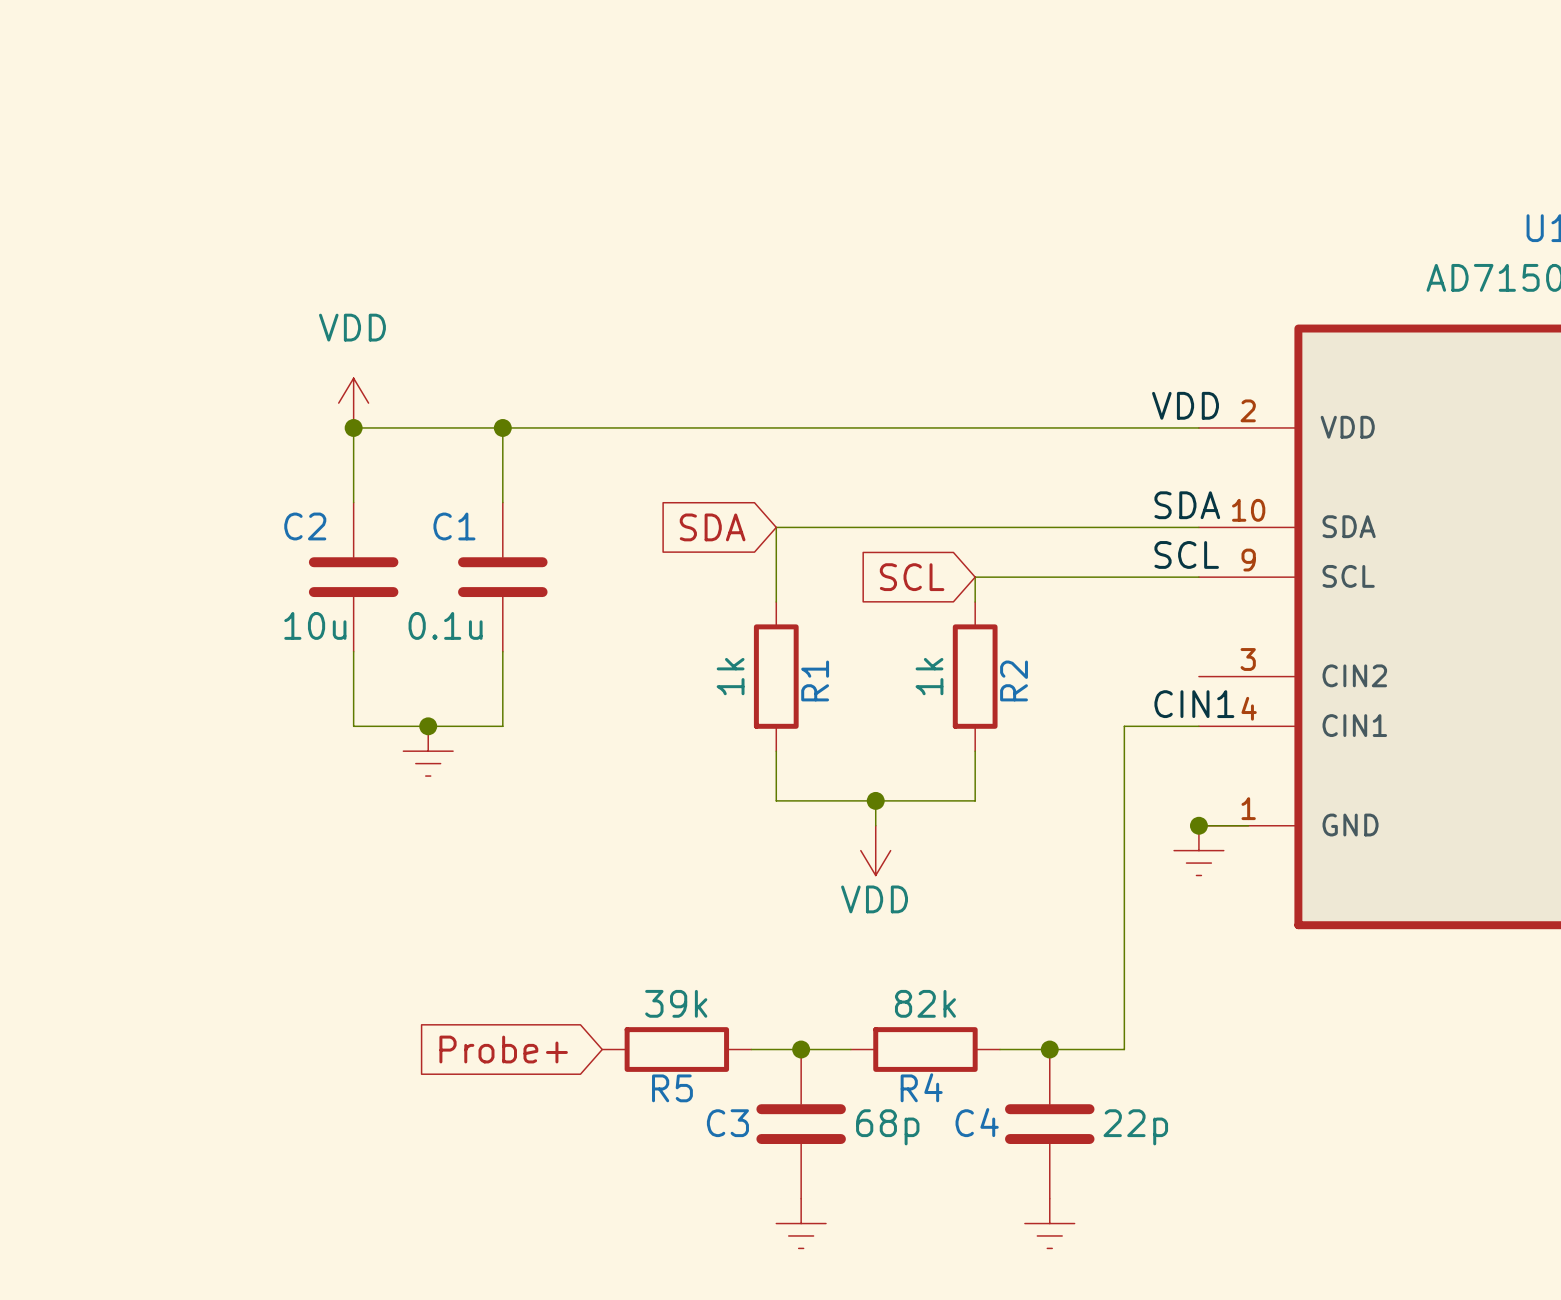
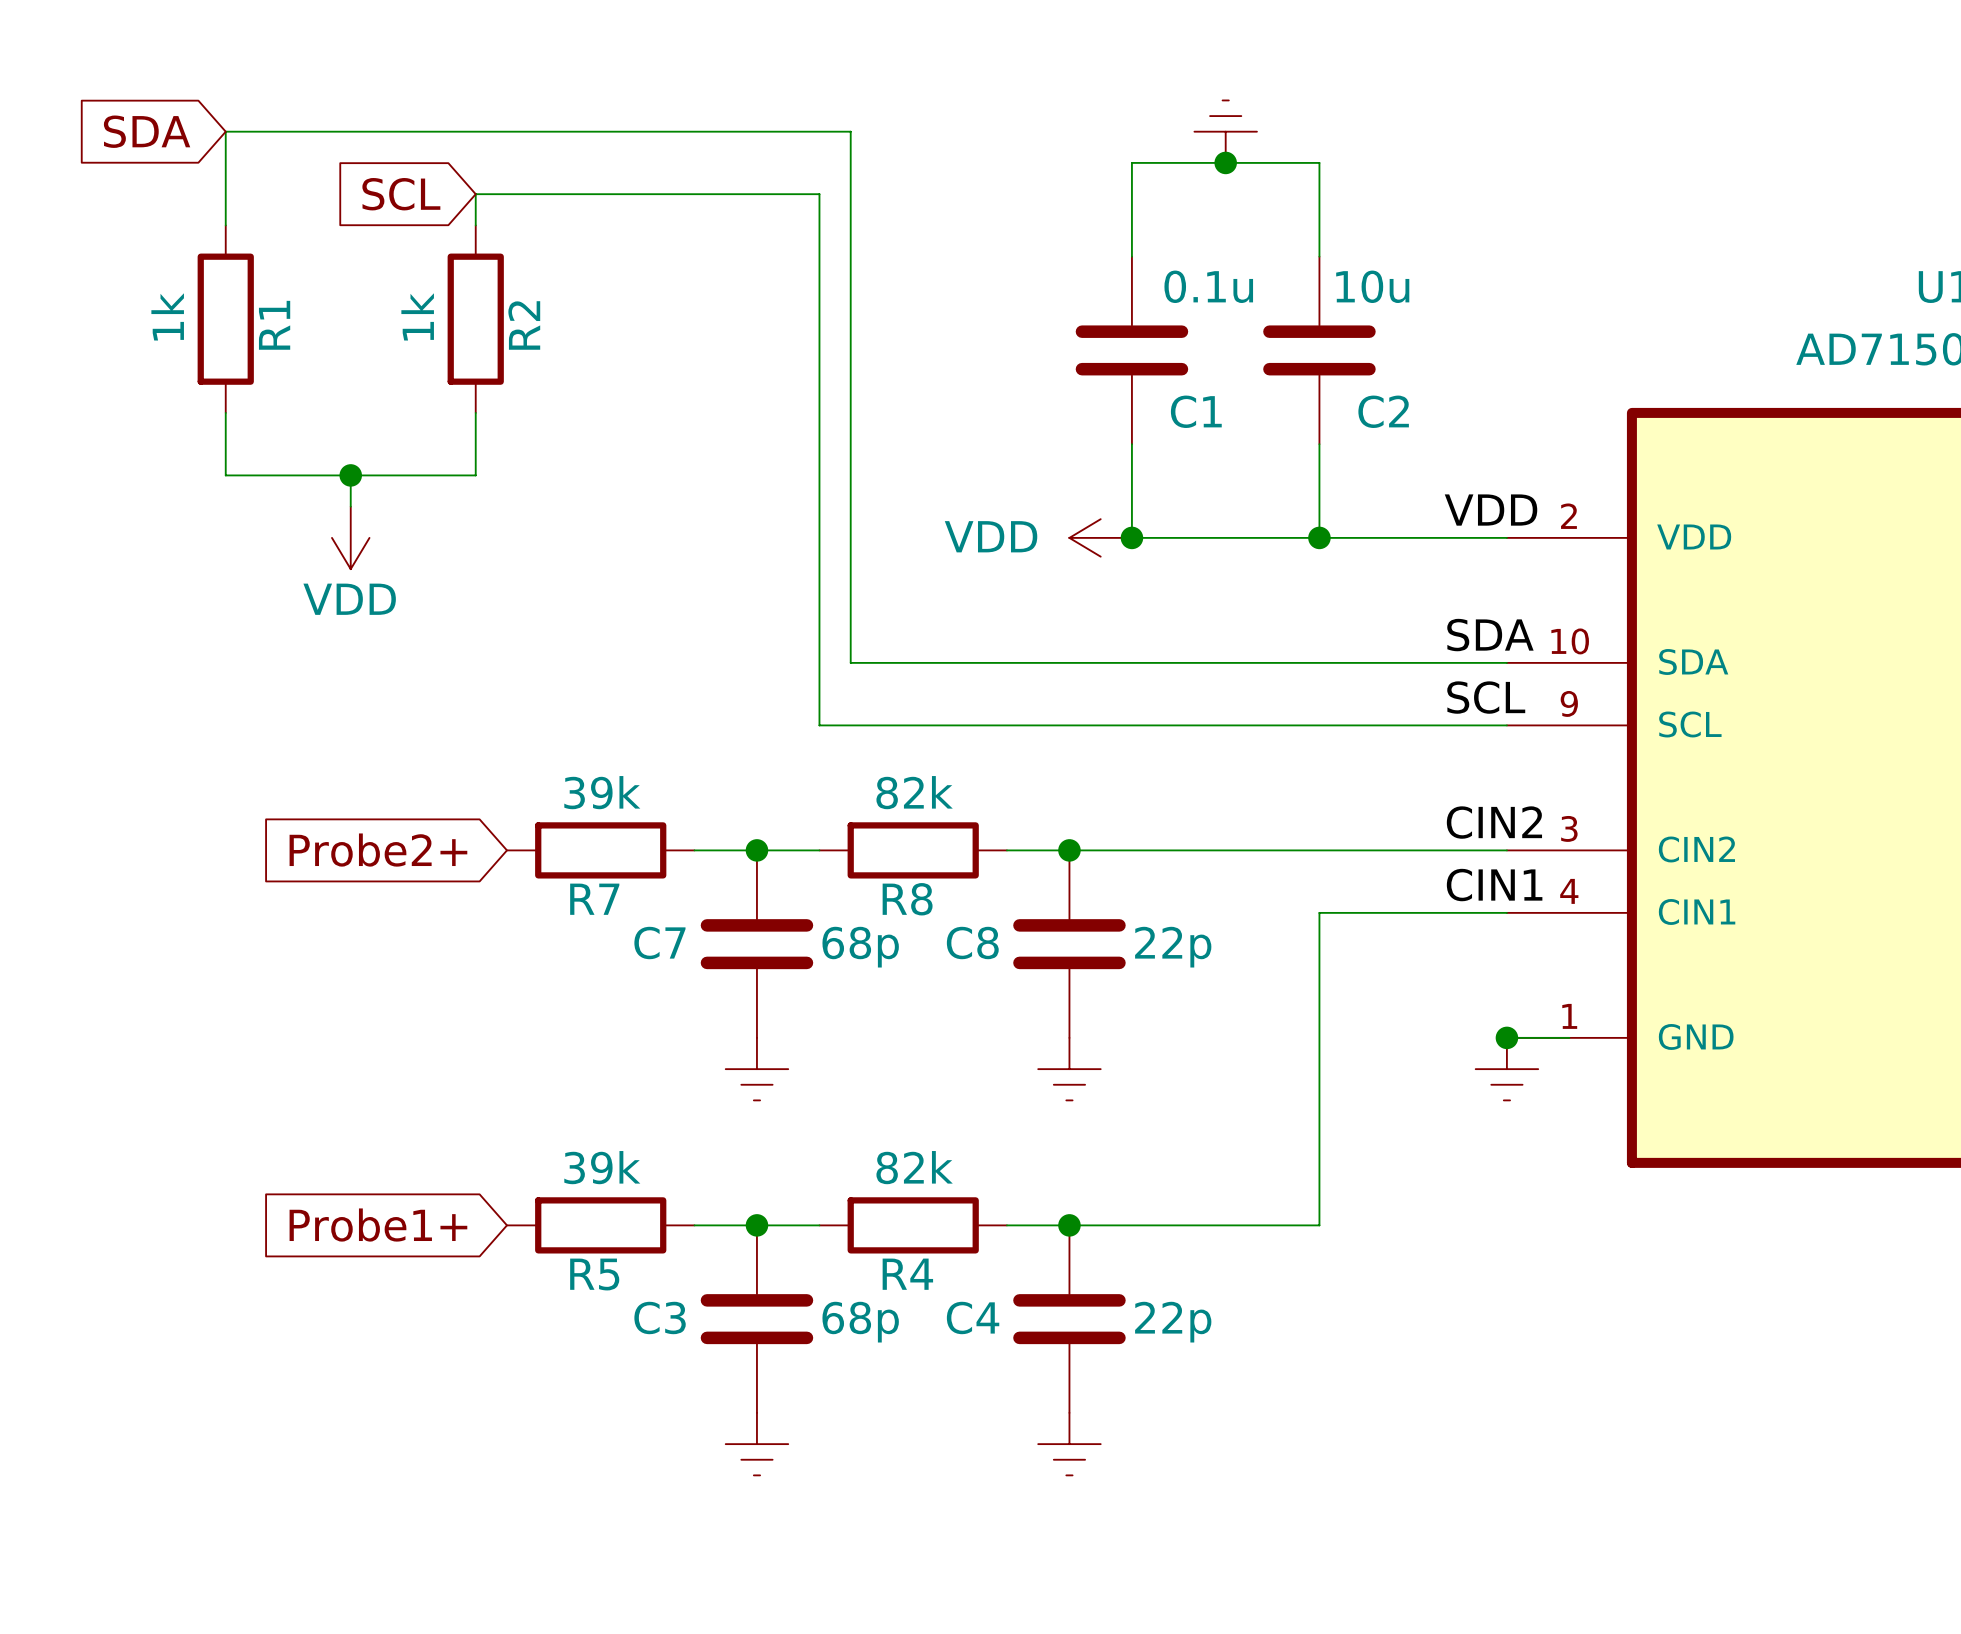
global label: none -> SDA (147, 131)
power symbol: none -> (1225, 131)
junction: none -> (1225, 162)
global label: none -> SCL (401, 194)
wire: none -> (1131, 256) (1131, 162) (1319, 162) (1319, 256)
wire: none -> (225, 412) (225, 475) (475, 475) (475, 412)
wire: none -> (1319, 444) (1319, 537)
wire: none -> (350, 475) (350, 506)
power symbol rotation: 0° (353, 403) -> 180° (350, 537)
power symbol position: VDD (353, 403) -> VDD (350, 537)
junction position: (353, 427) -> (350, 475)
wire: (502, 427) (502, 502) -> none
junction: (502, 427) -> none
power symbol: none -> VDD (1100, 537)
wire: (900, 427) (353, 427) (353, 502) -> (1131, 537) (1131, 444)
junction: none -> (1131, 537)
junction: none -> (1319, 537)
C2 name position: C2 (305, 526) -> C2 (1383, 411)
C1 name position: C1 (454, 526) -> C1 (1196, 411)
global label: SDA (712, 527) -> none
wire: (776, 527) (776, 602) -> (975, 662) (850, 662) (850, 131) (225, 131) (225, 225)
C2 position: (353, 577) -> (1319, 350)
C1 position: (502, 577) -> (1131, 350)
global label: SCL (912, 577) -> none
wire: (975, 577) (975, 602) -> (1225, 725) (819, 725) (819, 194) (475, 194) (475, 225)
C2 value position: 10u (315, 625) -> 10u (1372, 286)
C1 value position: 0.1u (445, 625) -> 0.1u (1208, 286)
wire: (353, 651) (353, 726) (502, 726) (502, 651) -> none
label: none -> CIN2 (1494, 822)
global label: none -> Probe2+ (378, 850)
R7: none -> 39k (600, 850)
wire: none -> (694, 850) (819, 850)
junction: none -> (756, 850)
R8: none -> 82k (913, 850)
R1 position: (776, 676) -> (225, 319)
wire: none -> (1006, 850) (1506, 850)
junction: none -> (1069, 850)
R2 position: (975, 676) -> (475, 319)
junction: (428, 726) -> none
wire: (1124, 726) (1124, 1049) (1000, 1049) -> (1413, 912) (1319, 912) (1319, 1225) (1006, 1225)
power symbol position: (428, 751) -> (756, 1069)
C7: none -> 68p (756, 944)
wire: (776, 751) (776, 800) (975, 800) (975, 751) -> none
C8: none -> 22p (1069, 944)
wire: (875, 800) (875, 825) -> none
junction: (875, 800) -> none
power symbol: none -> (1069, 1069)
power symbol: VDD (875, 850) -> none
global label: none -> Probe1+ (378, 1225)
junction: none -> (756, 1225)
junction: none -> (1069, 1225)
global label: Probe+ (503, 1049) -> none
R5 position: (676, 1049) -> (600, 1225)
wire: (751, 1049) (850, 1049) -> (694, 1225) (819, 1225)
junction: (801, 1049) -> none
R4 position: (925, 1049) -> (913, 1225)
junction: (1049, 1049) -> none
C3 position: (801, 1124) -> (756, 1319)
C4 position: (1049, 1124) -> (1069, 1319)
power symbol: none -> (756, 1444)
power symbol position: (801, 1223) -> (1069, 1444)
power symbol: (1049, 1223) -> none

